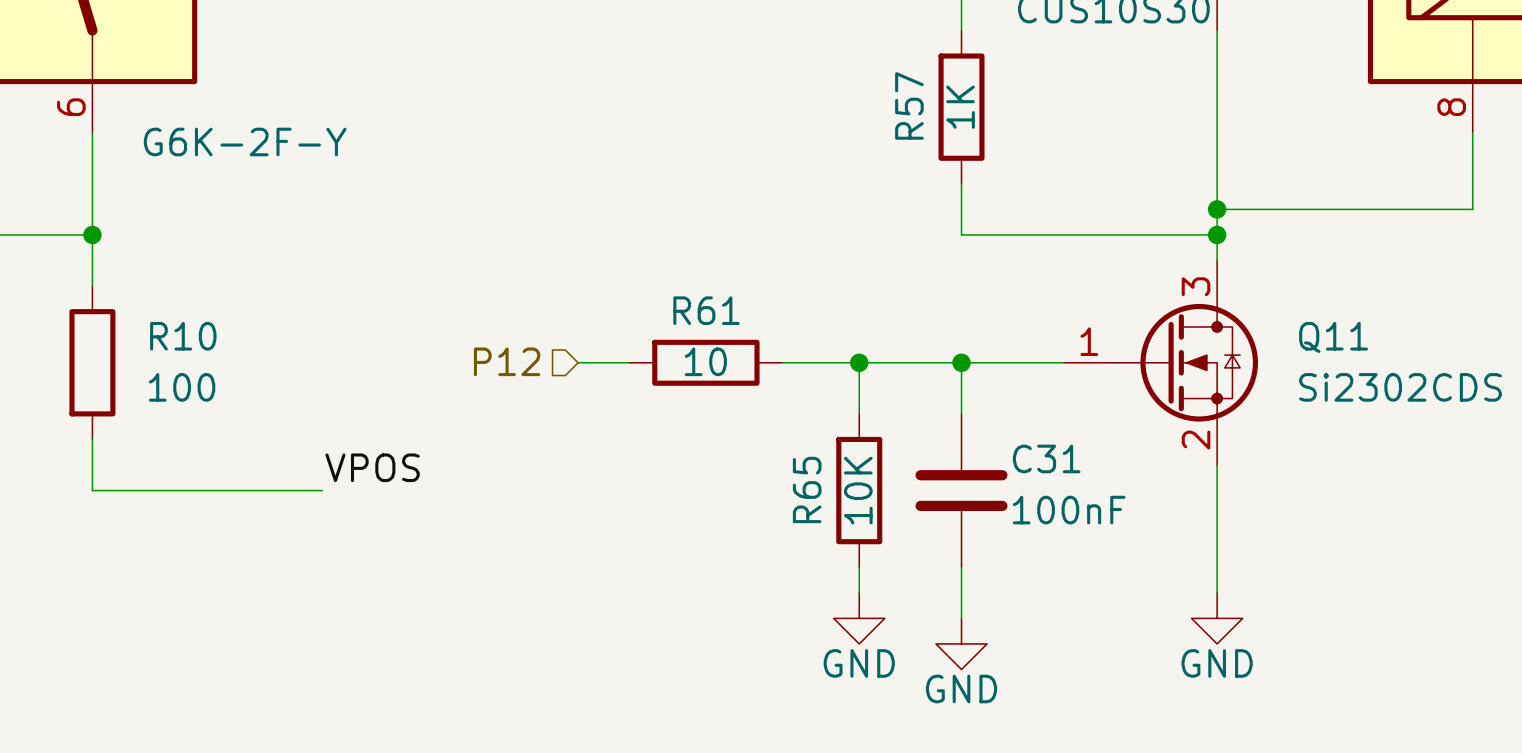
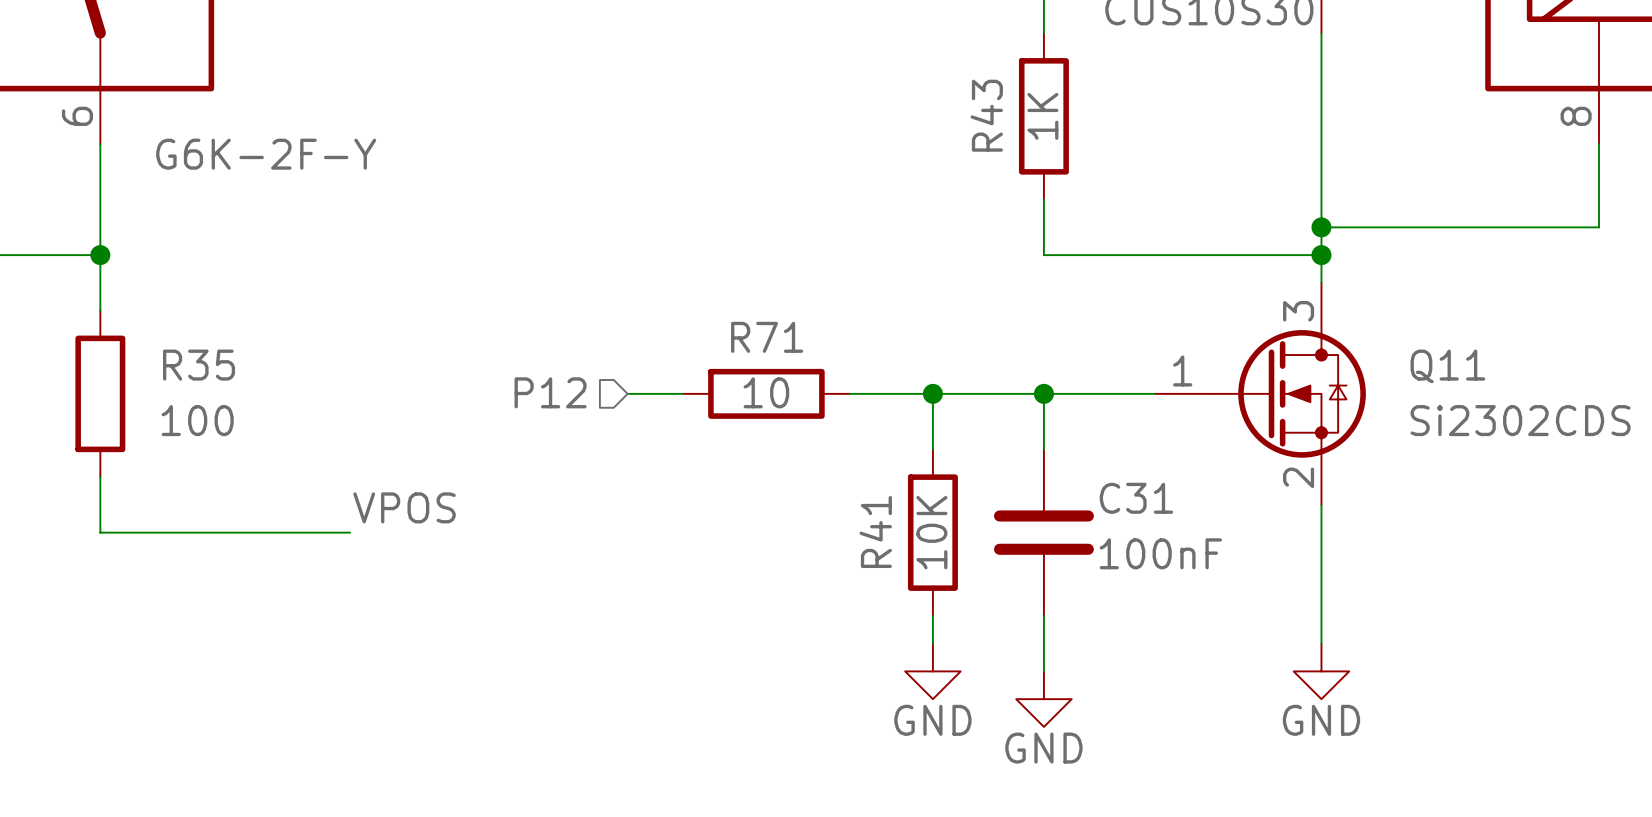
R57 name: R57 (909, 105) -> R43 (986, 115)
R61 name: R61 (706, 310) -> R71 (767, 337)
R10 name: R10 (183, 336) -> R35 (199, 365)
R65 name: R65 (807, 489) -> R41 (875, 531)

